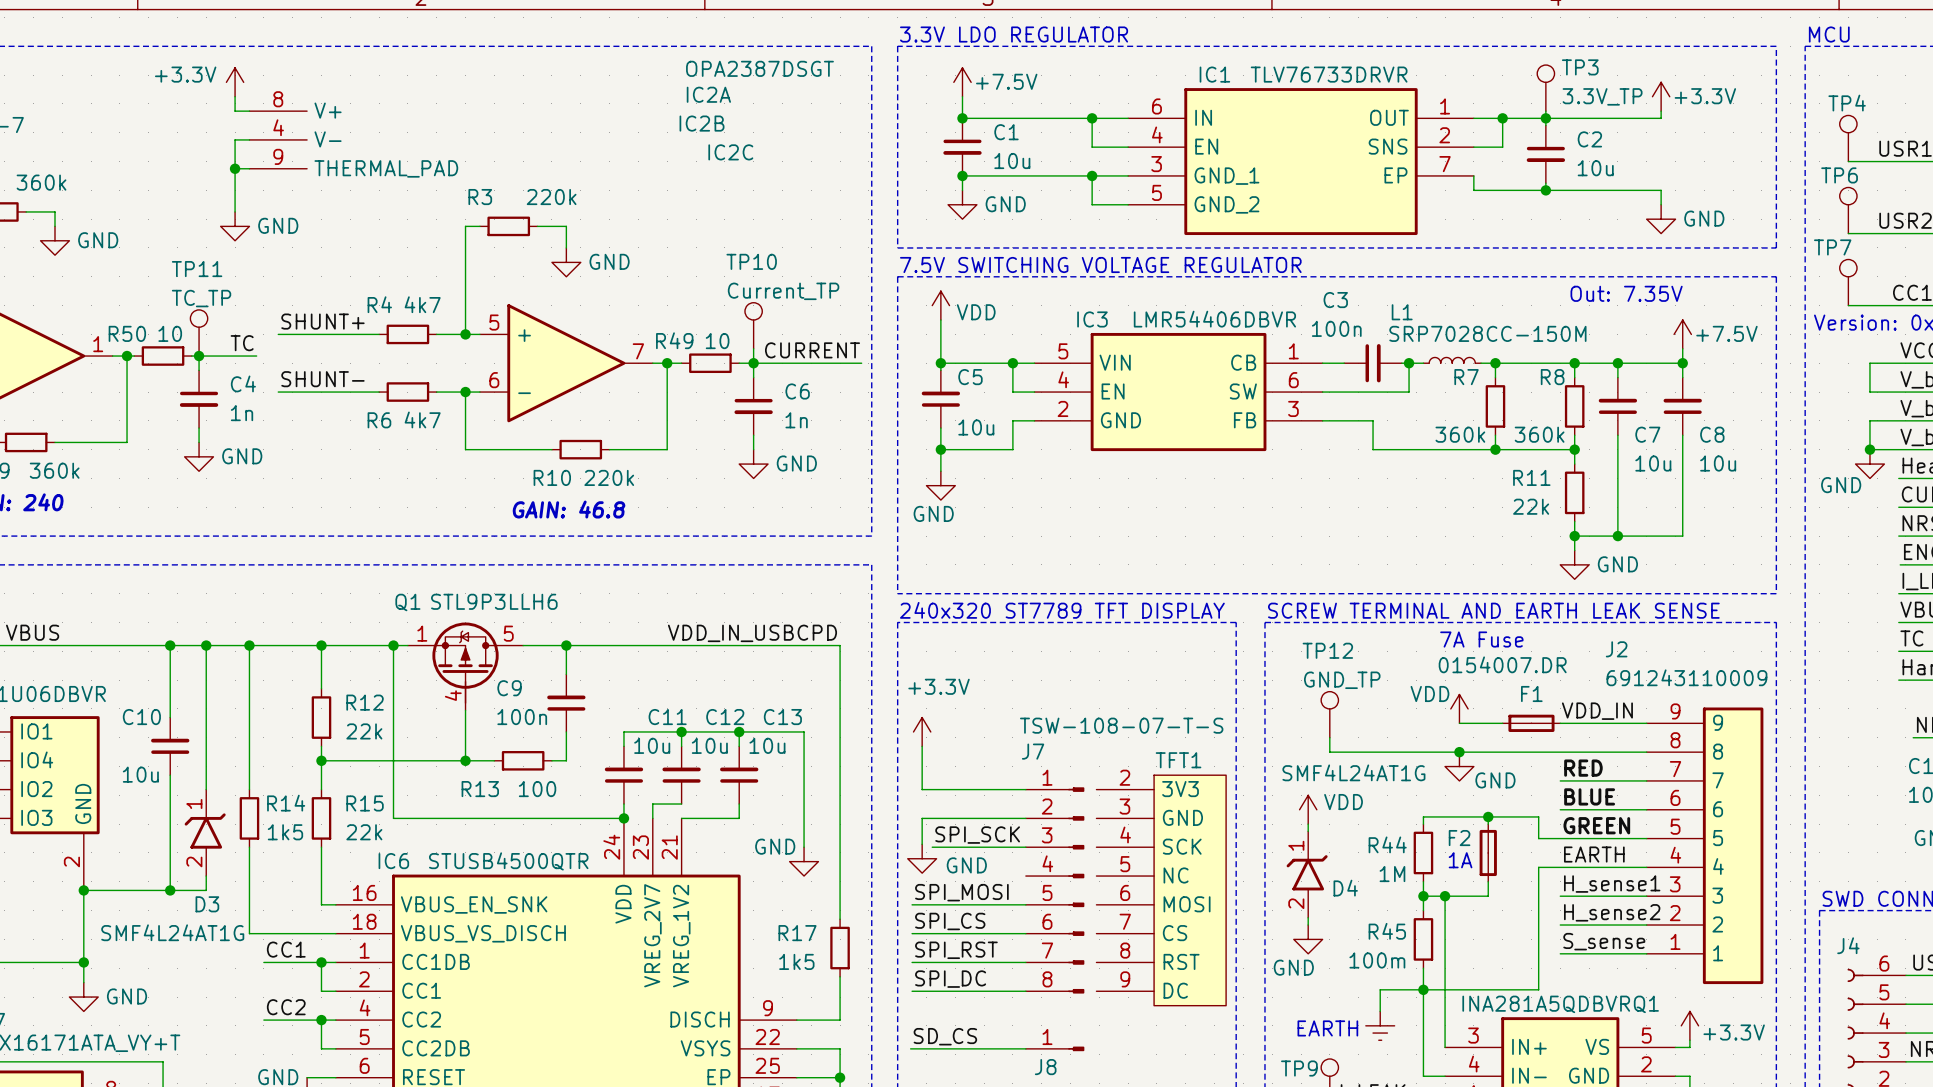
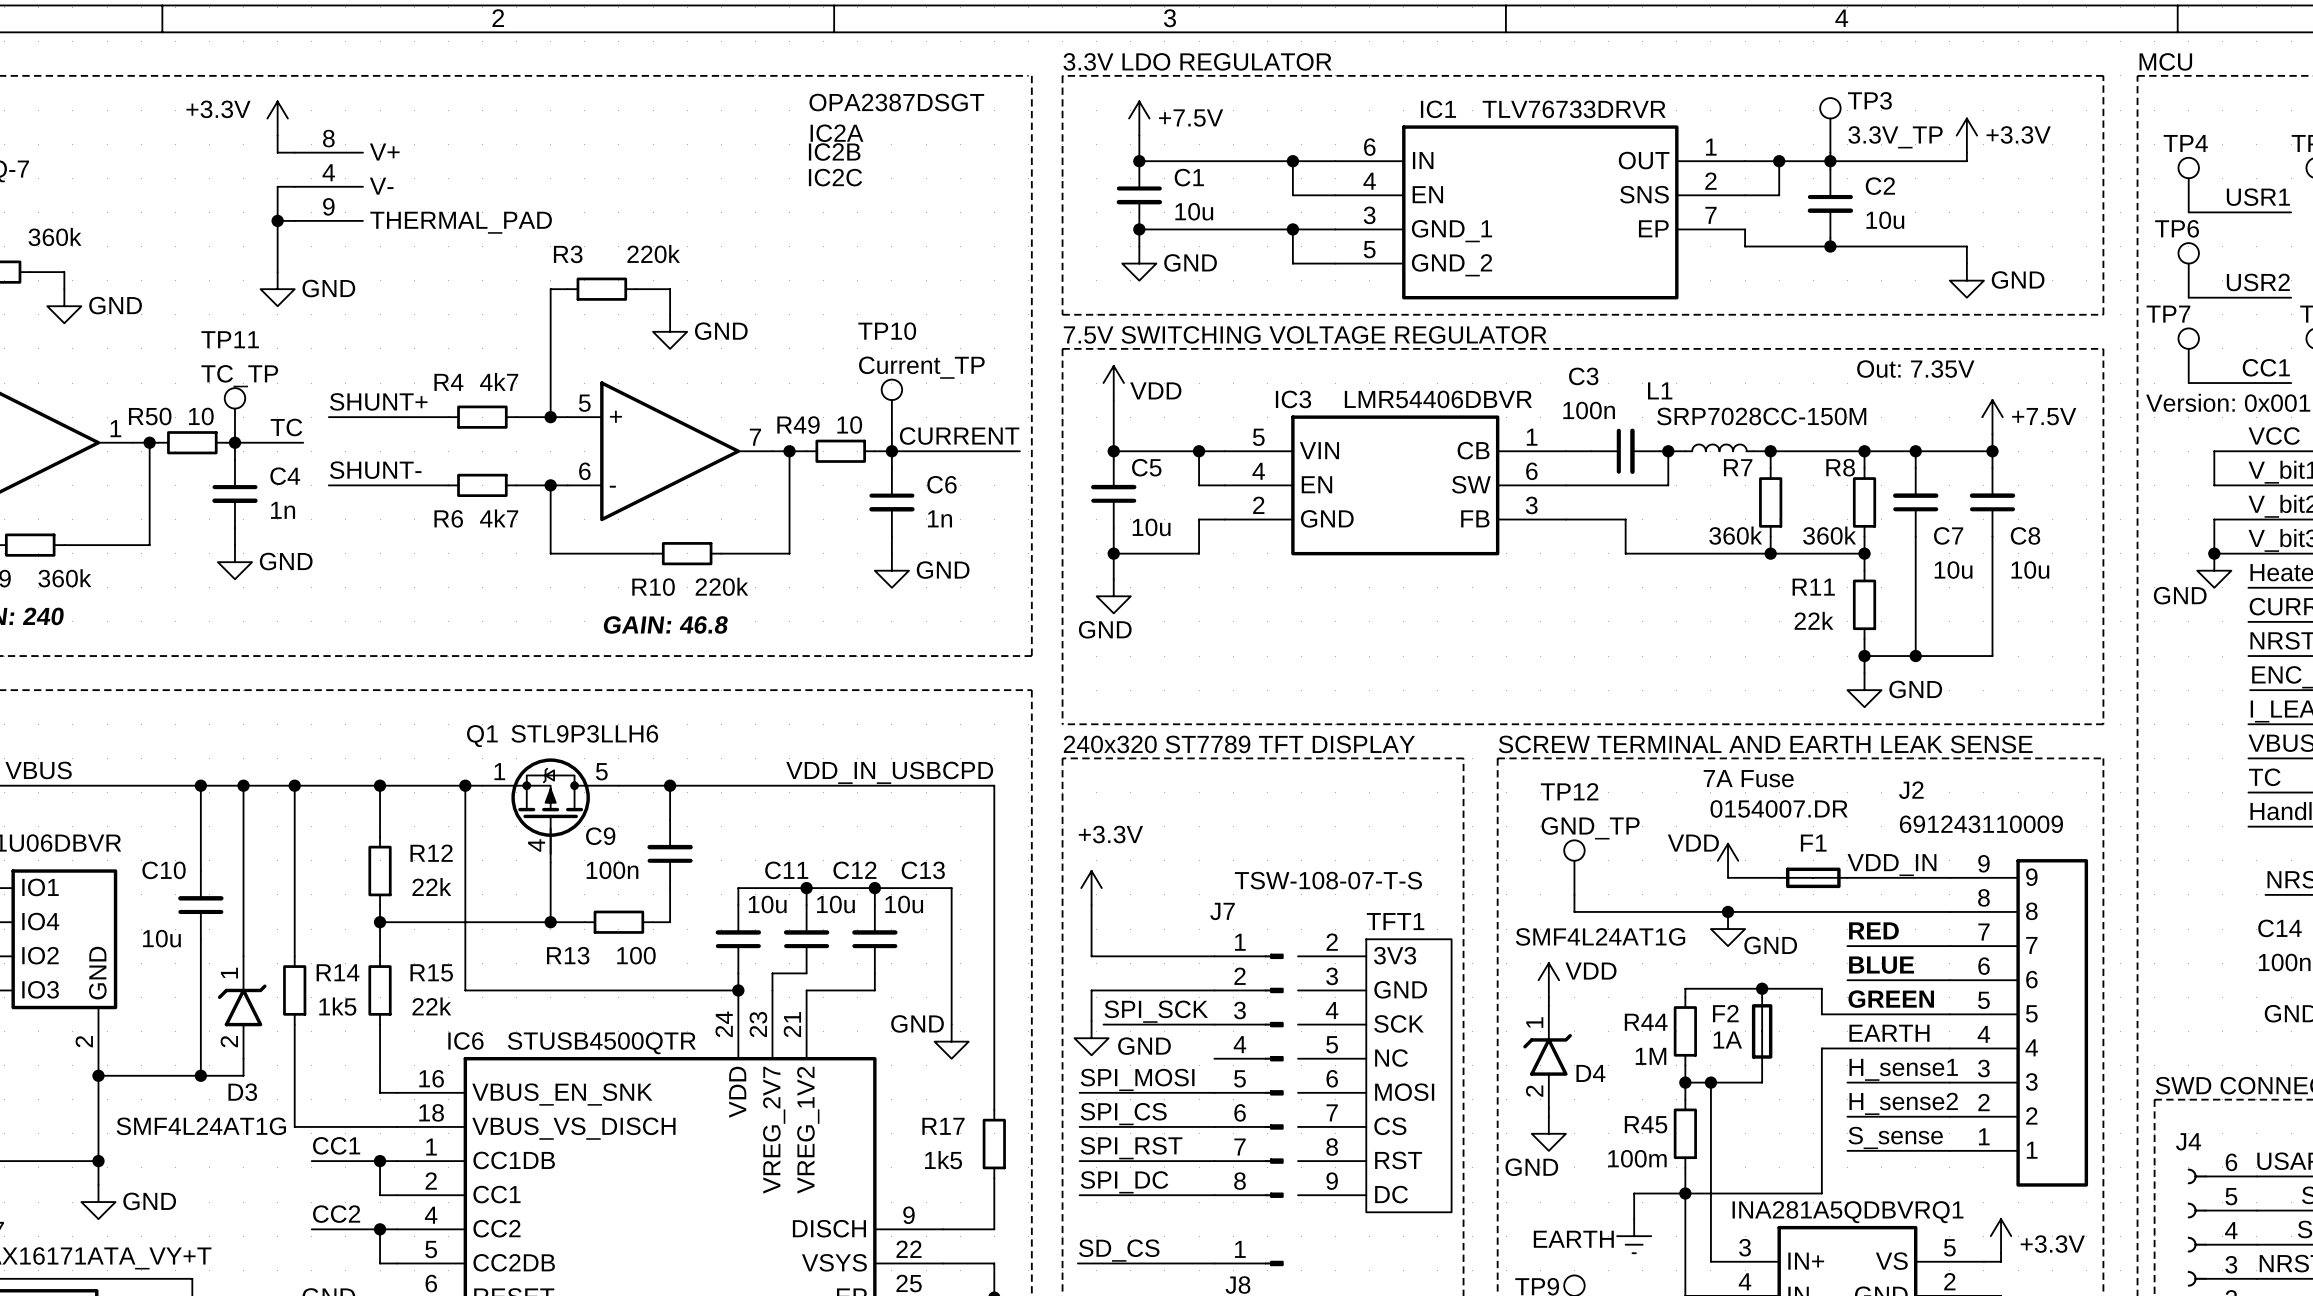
IC2B name position: IC2B (702, 123) -> IC2B (834, 152)
IC2C name position: IC2C (730, 152) -> IC2C (835, 177)

